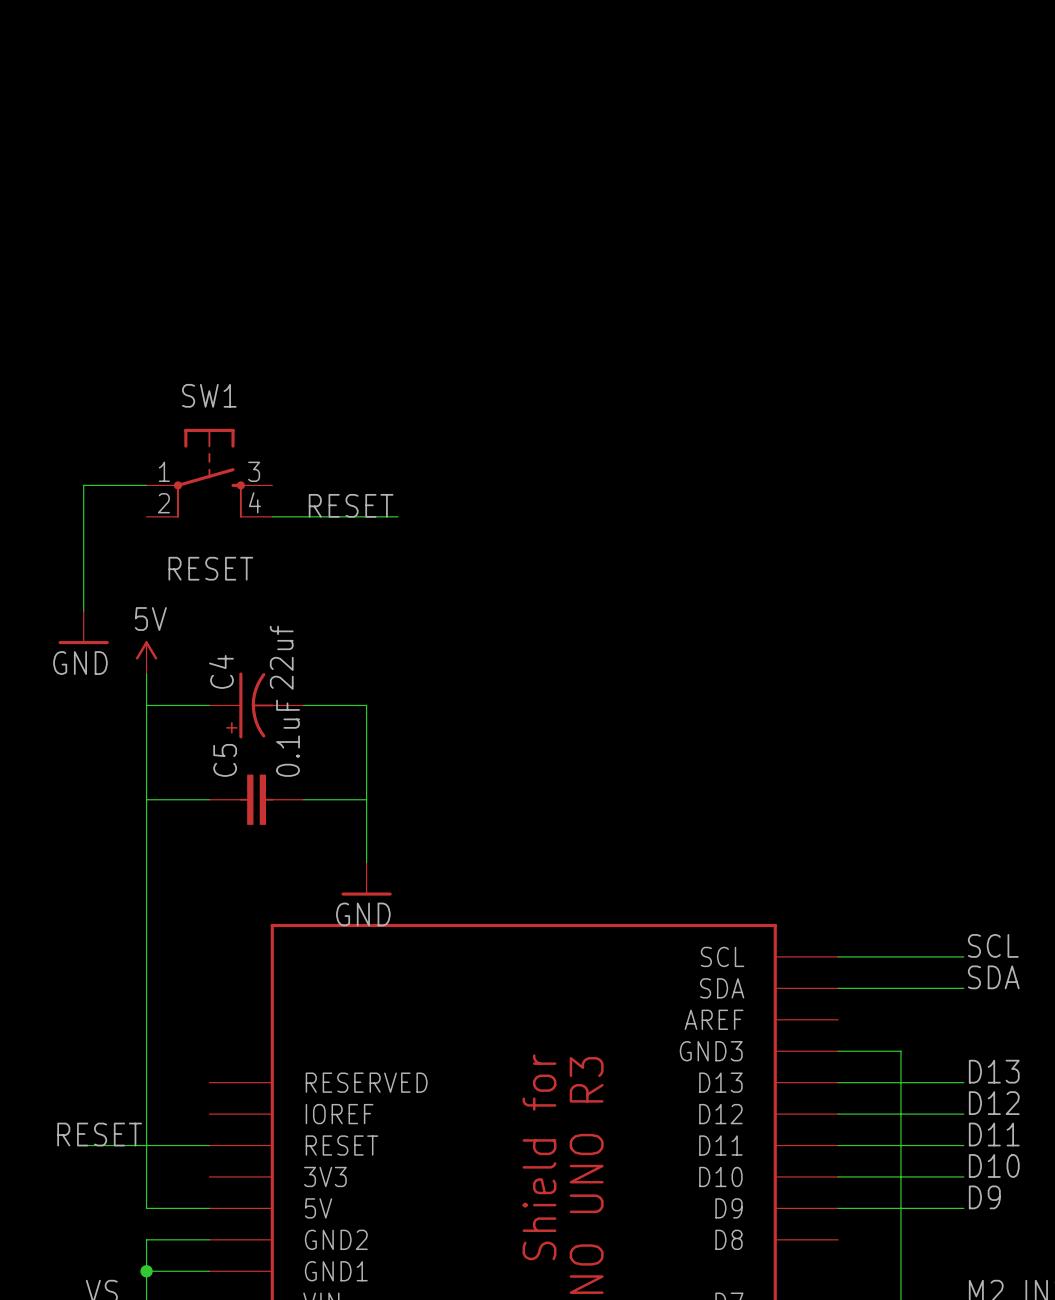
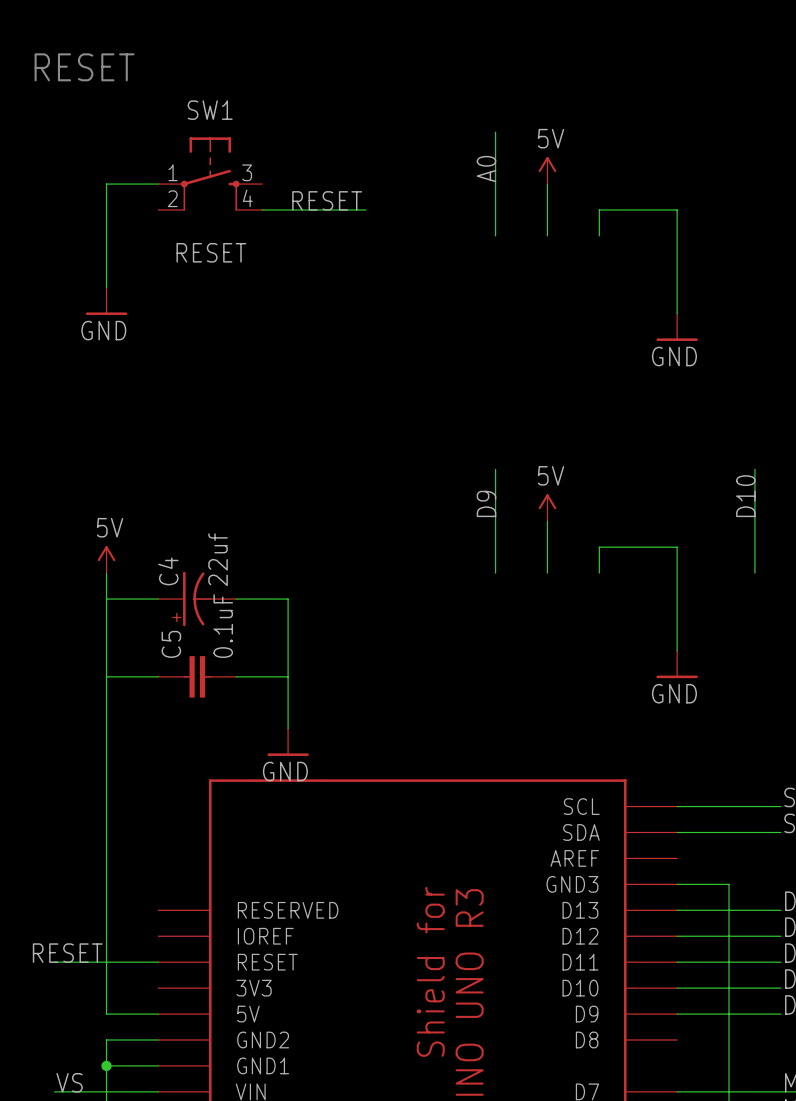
text: none -> RESET (84, 67)
wire: none -> (495, 132) (495, 235)
label: none -> A0 (486, 169)
power symbol: none -> 5V (547, 170)
wire: none -> (547, 184) (547, 235)
wire: none -> (599, 235) (599, 209) (677, 209) (677, 313)
power symbol: none -> GND (677, 327)
SW1 position: (209, 473) -> (210, 174)
wire: (146, 485) (83, 485) (83, 611) -> (158, 184) (106, 184) (106, 287)
label position: RESET (351, 505) -> RESET (327, 200)
wire: (272, 516) (398, 516) -> (262, 209) (365, 209)
wire: none -> (495, 469) (495, 573)
wire: none -> (754, 469) (754, 573)
label: none -> D10 (745, 496)
label: none -> D9 (486, 503)
power symbol: none -> 5V (547, 507)
wire: none -> (547, 521) (547, 573)
power symbol position: GND (83, 627) -> GND (106, 301)
wire: none -> (599, 573) (599, 547) (677, 547) (677, 650)
power symbol: none -> GND (677, 664)

